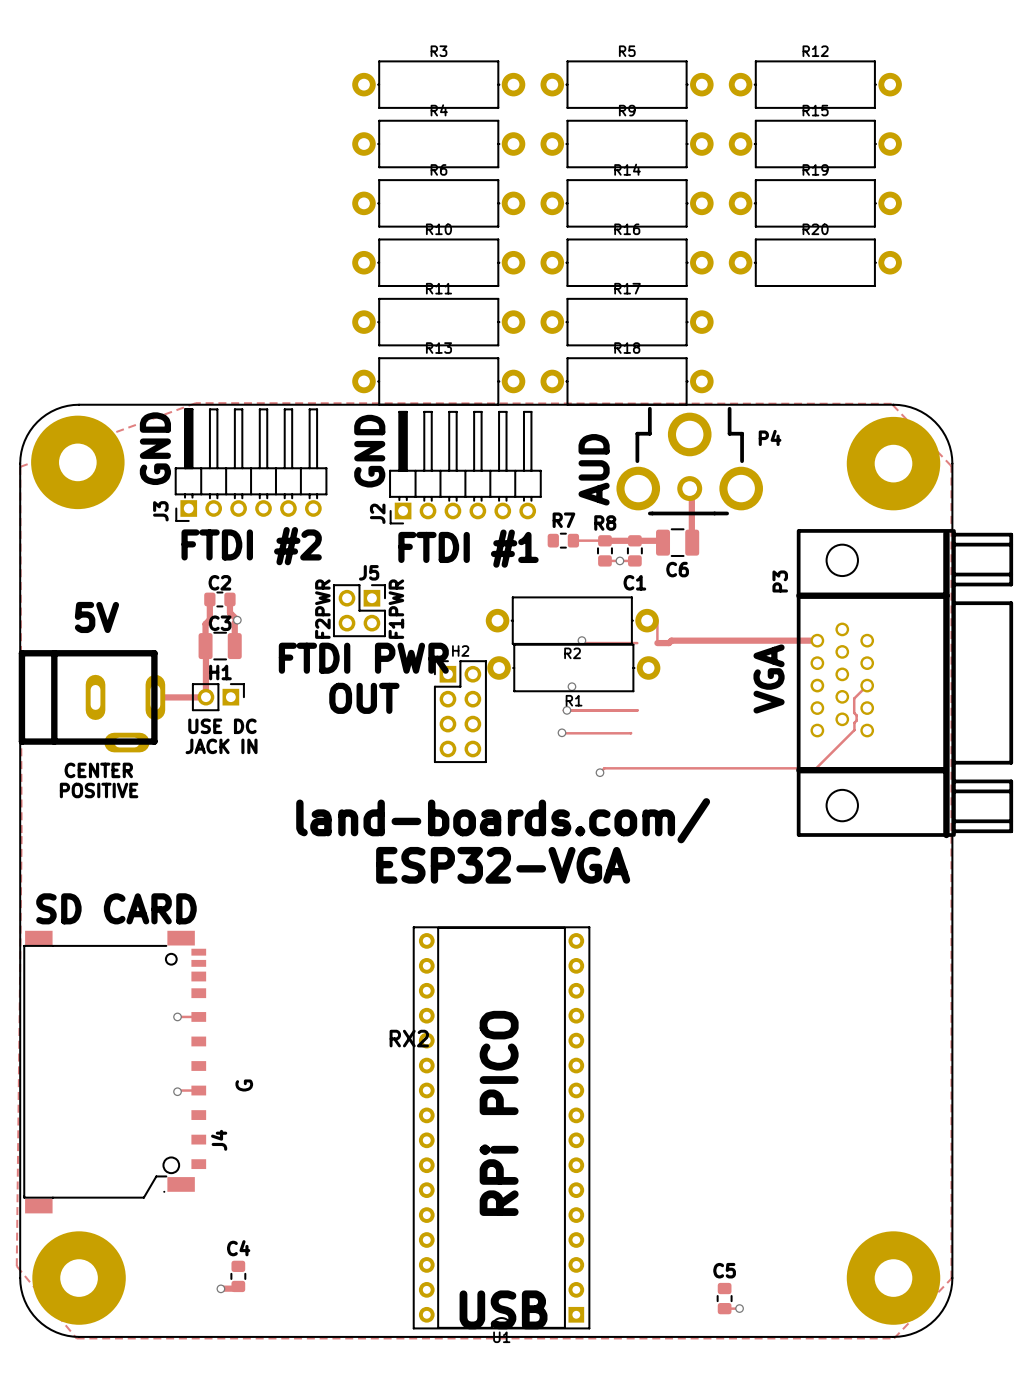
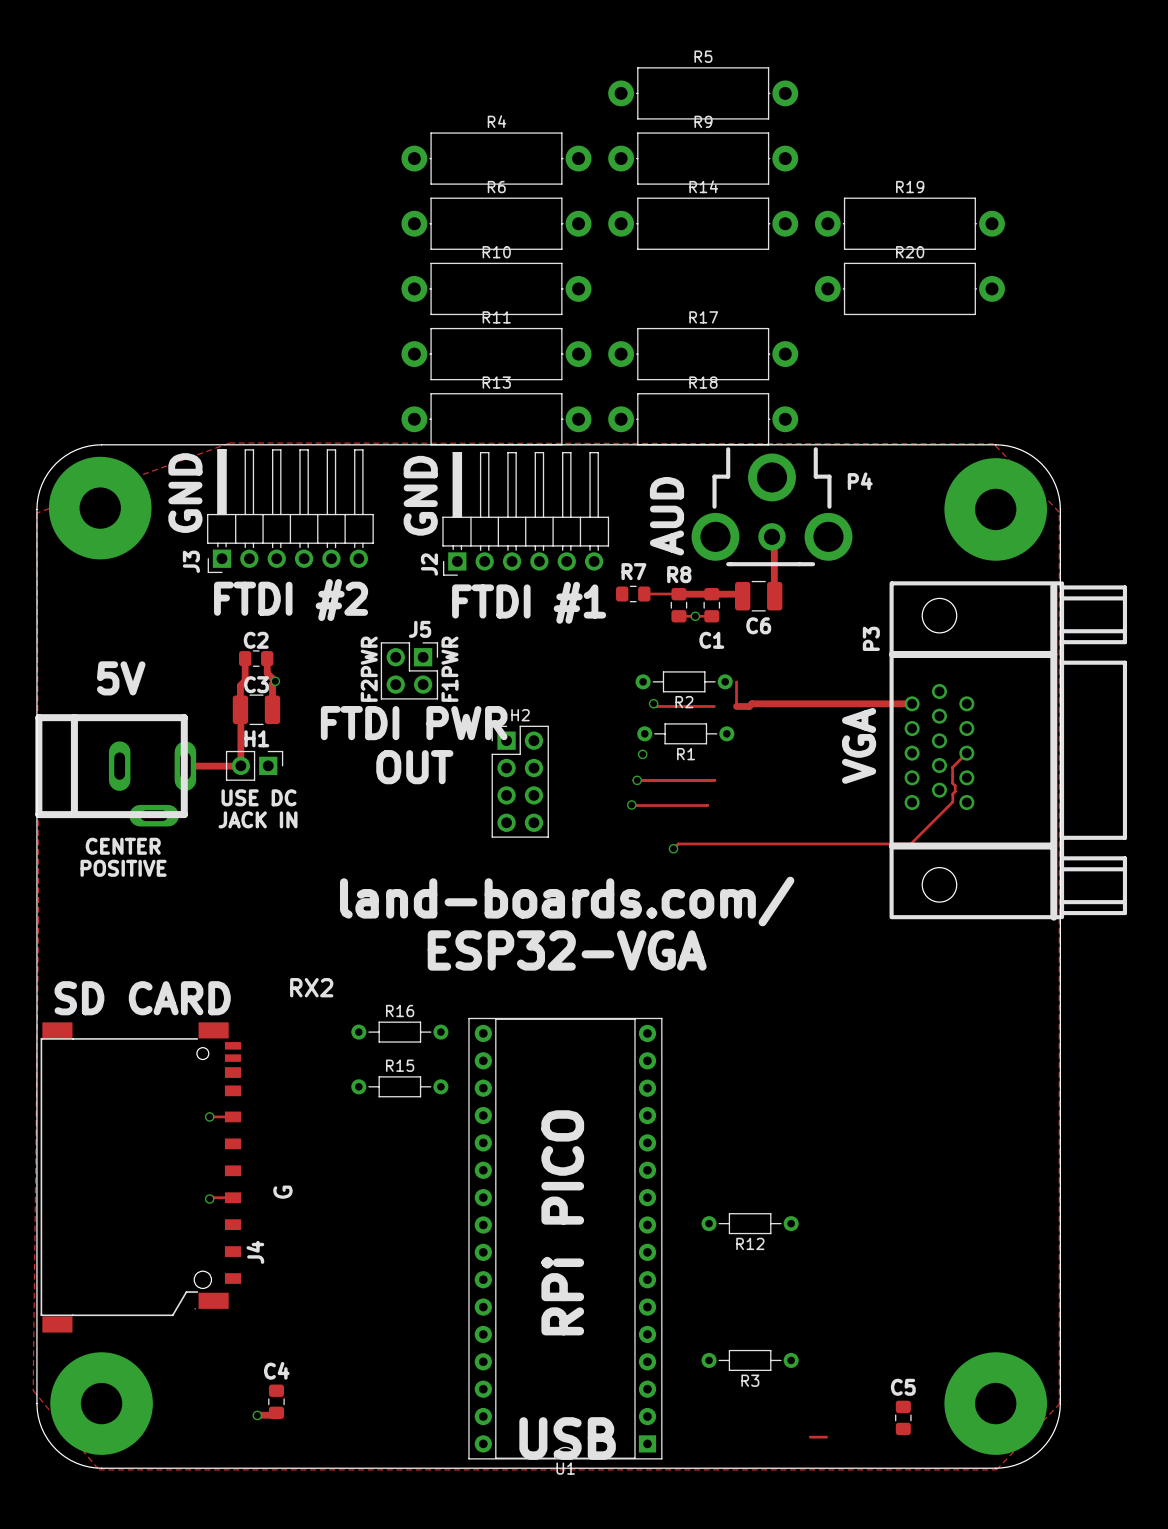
R3 name position: R3 (438, 51) -> R3 (750, 1380)
R12 name position: R12 (815, 51) -> R12 (750, 1243)
R3 footprint: [352, 60, 526, 109] -> [701, 1349, 799, 1372]
R12 footprint: [728, 60, 902, 109] -> [701, 1213, 799, 1235]
R15 footprint: [728, 120, 902, 168] -> [351, 1076, 449, 1098]
R16 footprint: [540, 238, 714, 287] -> [351, 1021, 449, 1043]
R2 footprint: [485, 596, 659, 645] -> [635, 671, 733, 693]
R1 footprint: [487, 644, 661, 692] -> [637, 723, 735, 745]
text position: RX2 (409, 1038) -> RX2 (311, 987)
C5 position: (724, 1298) -> (903, 1417)
via: (739, 1308) -> none

